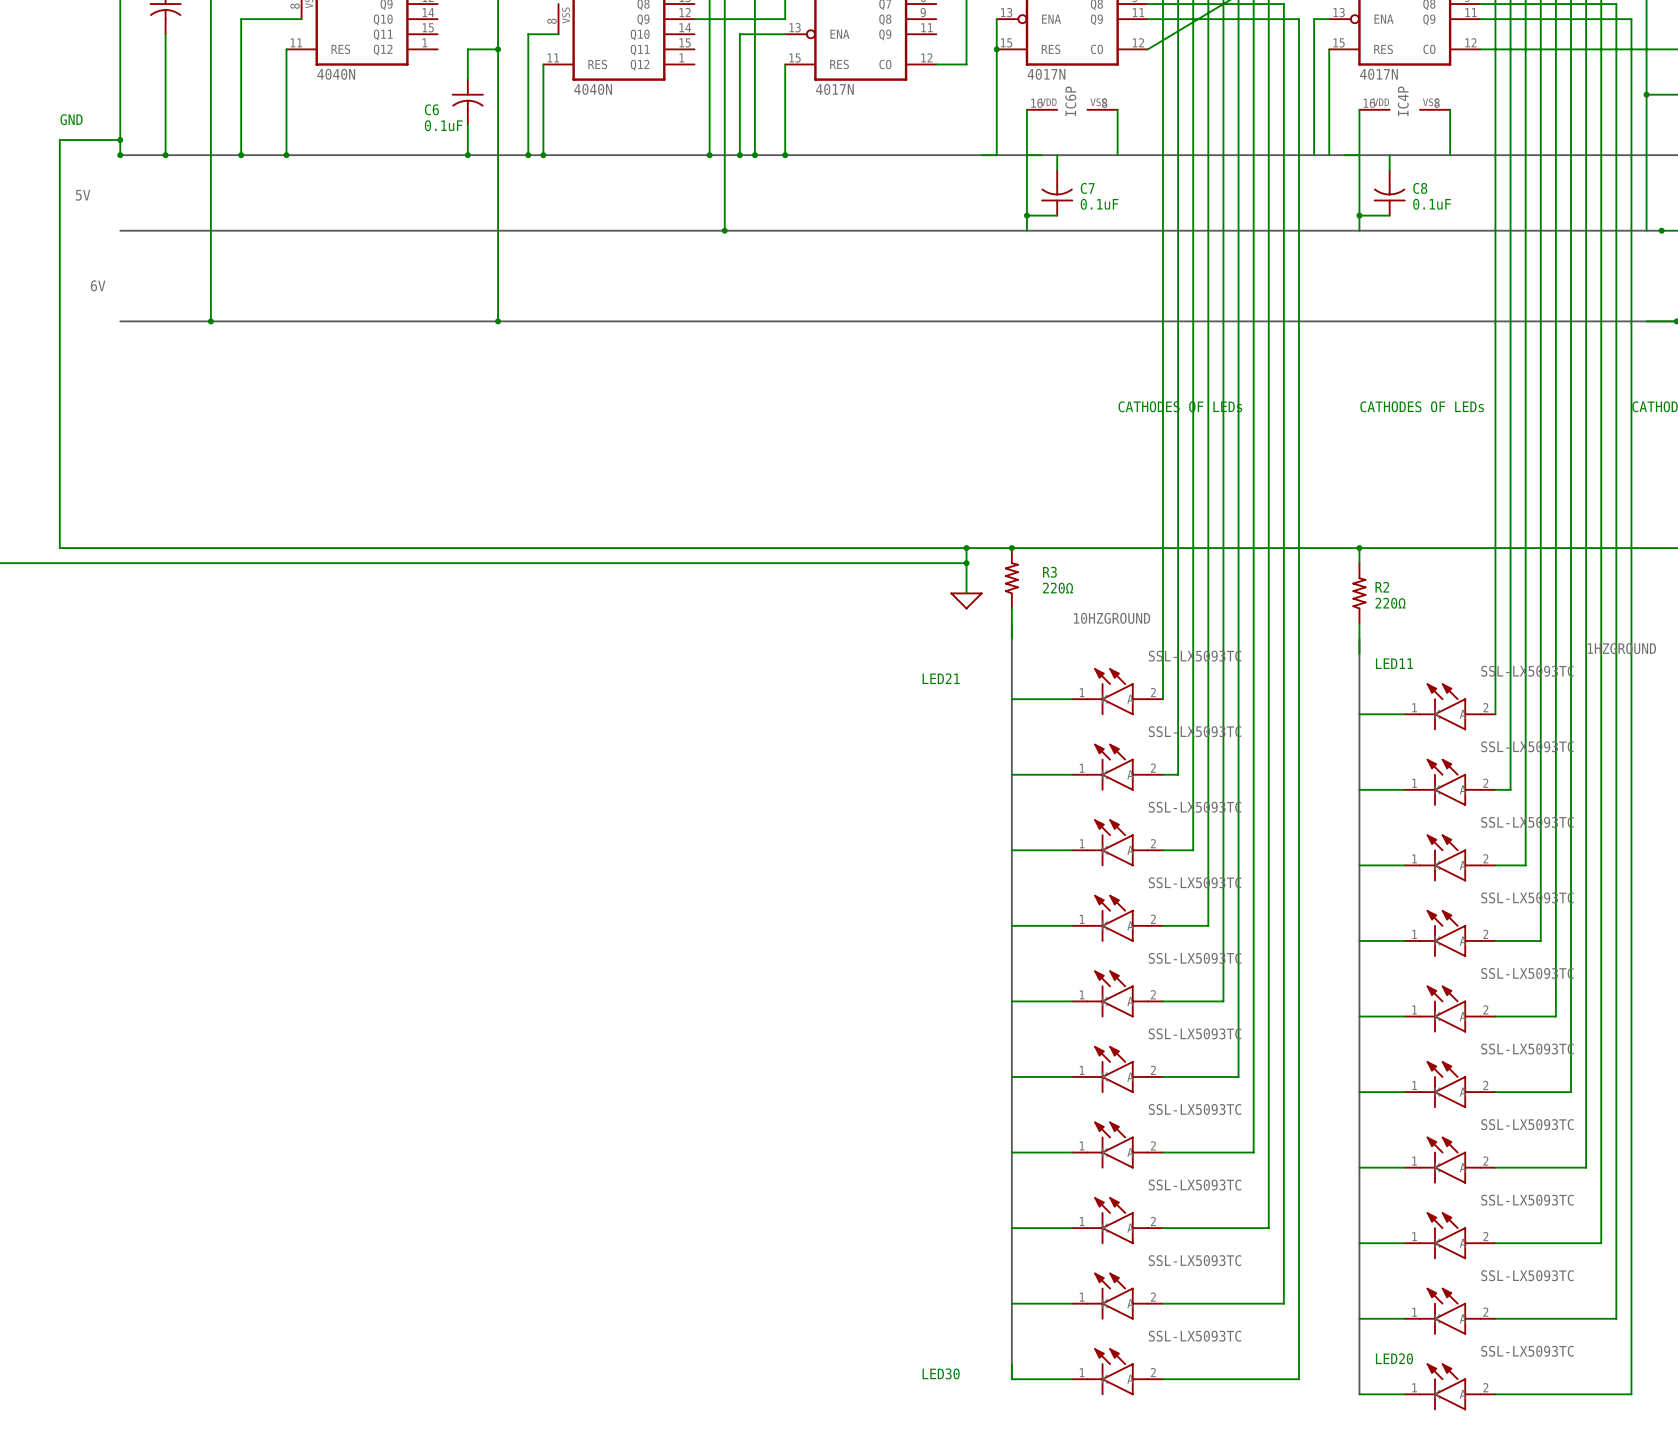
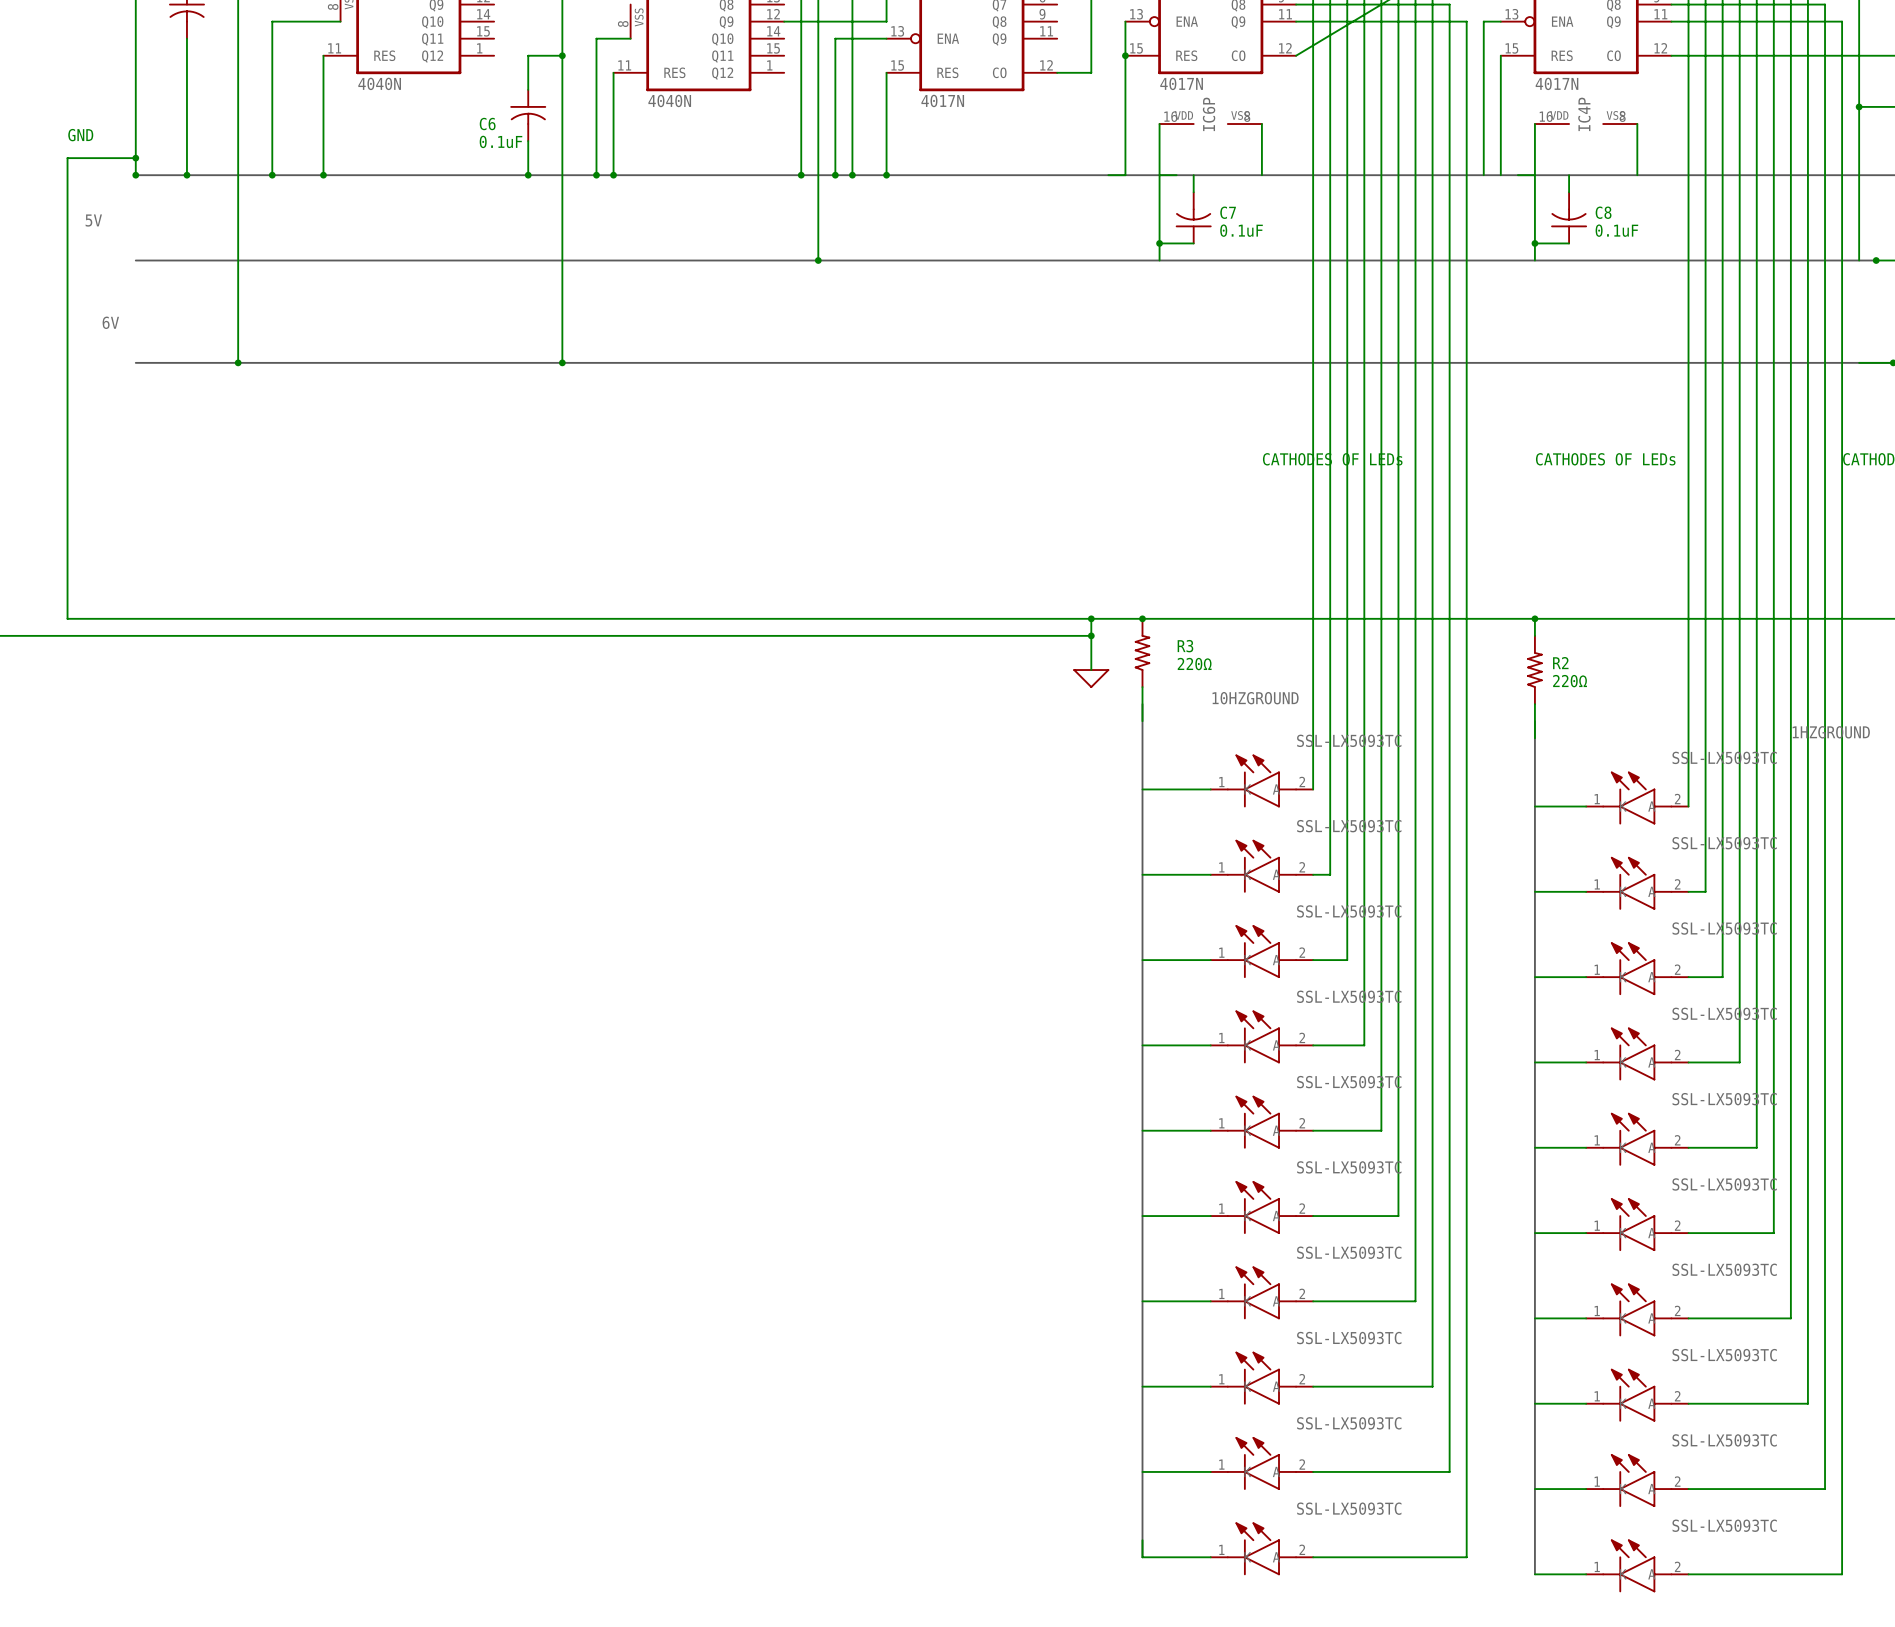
text: LED11 (1394, 663) -> none
text: LED21 (941, 678) -> none
text: LED20 (1394, 1358) -> none
text: LED30 (941, 1373) -> none

